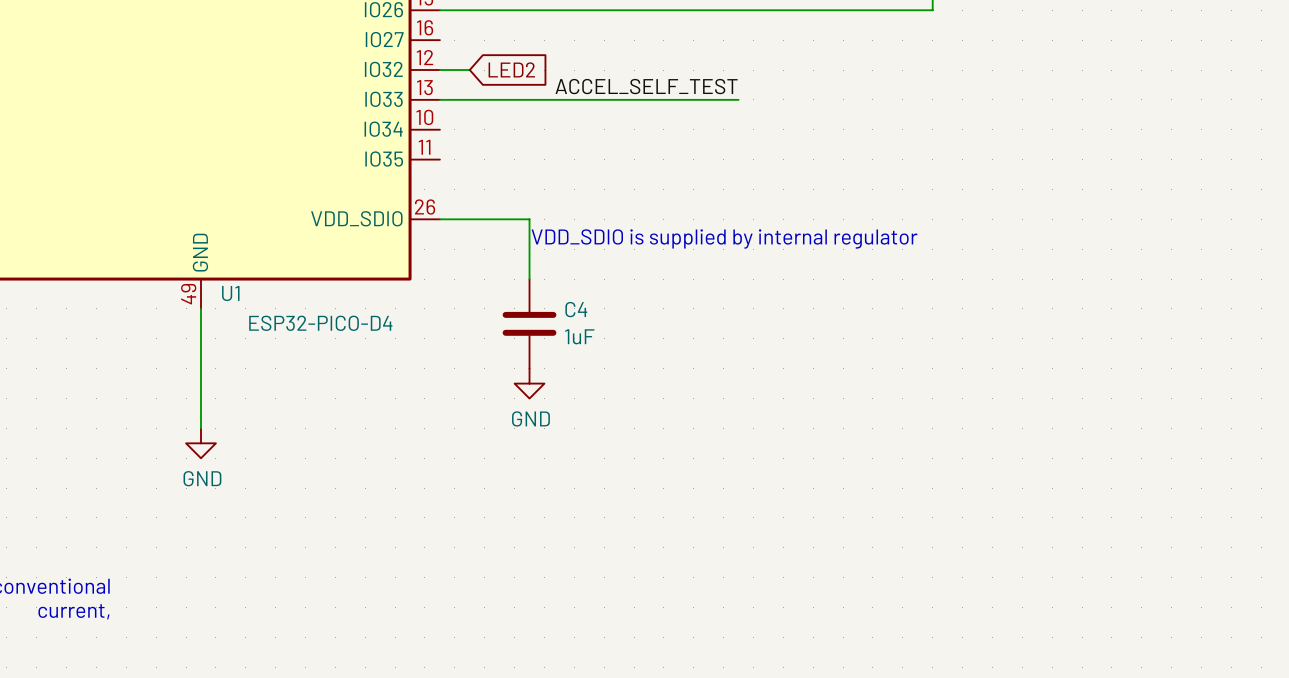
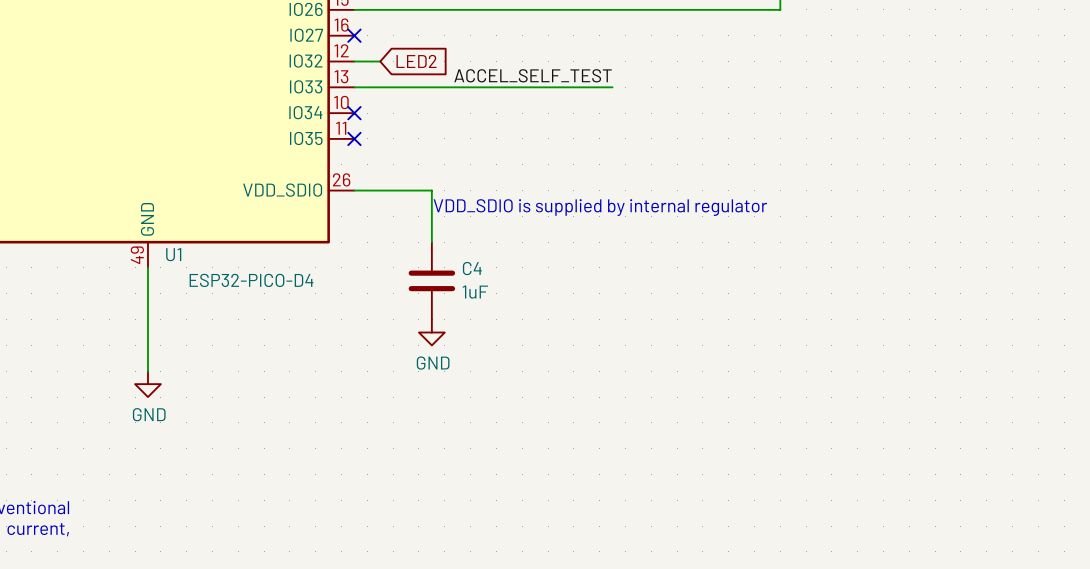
no-connect mark: none -> (354, 35)
no-connect mark: none -> (354, 113)
no-connect mark: none -> (354, 138)

